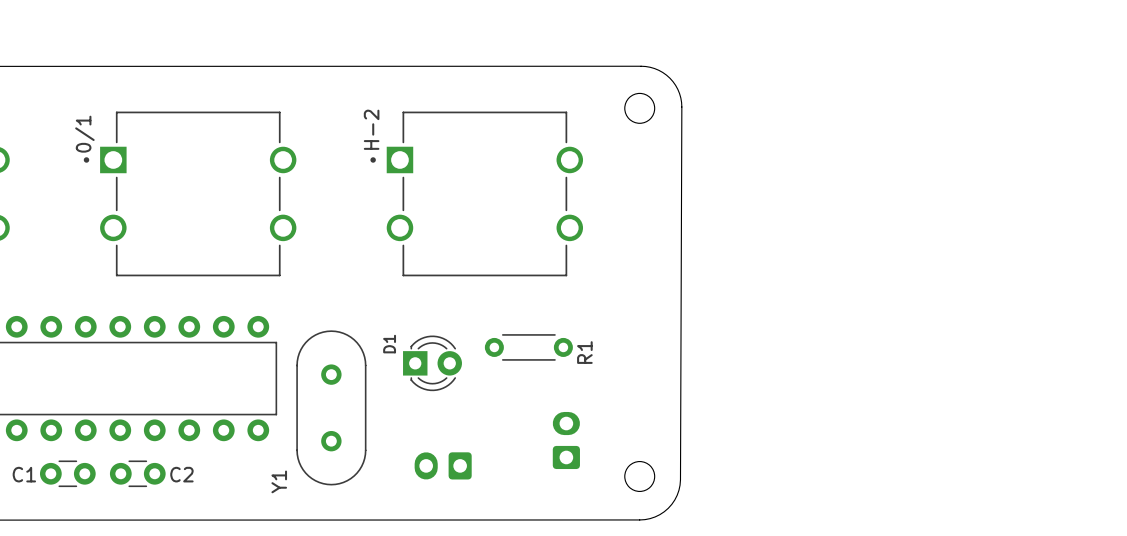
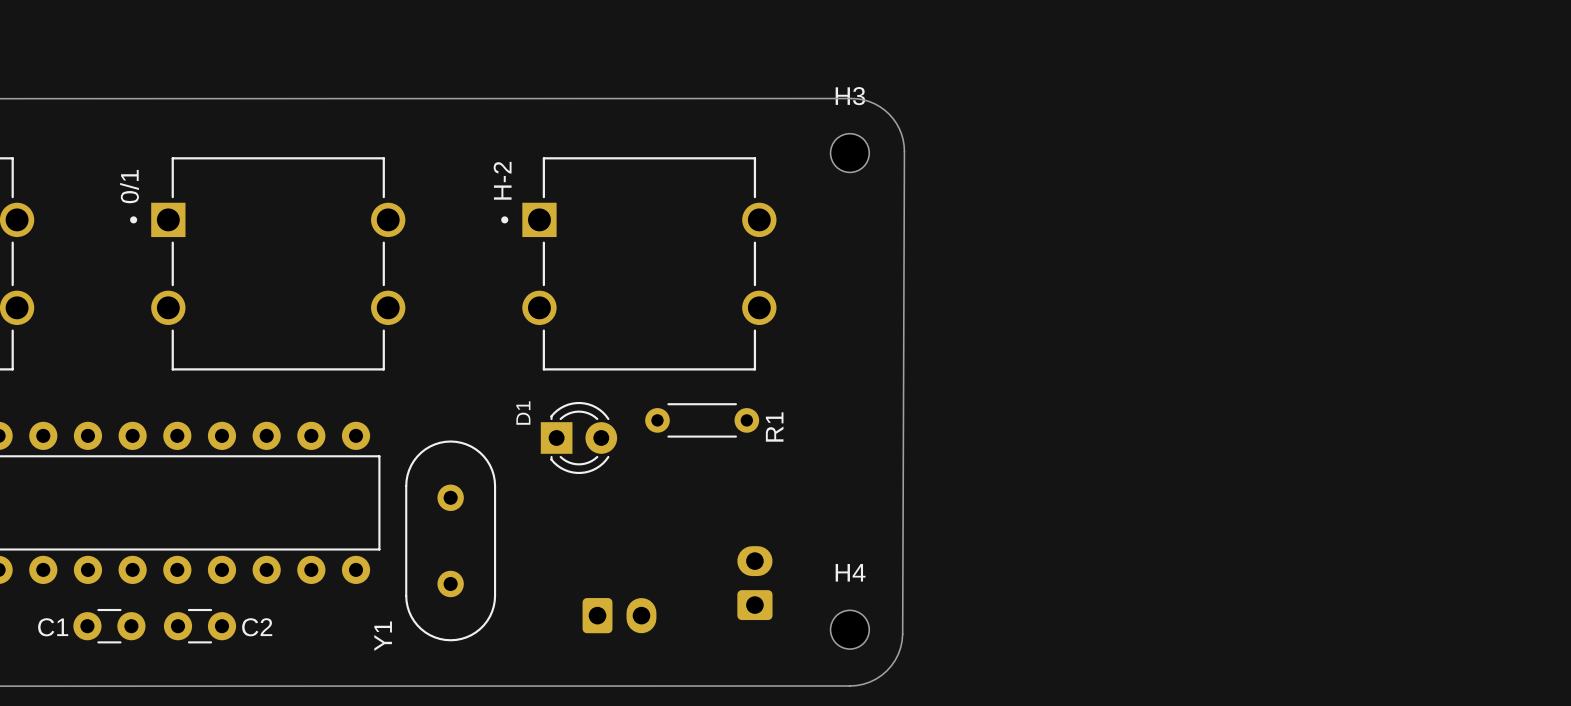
H3 name: none -> H3 (850, 96)
R1 position: (528, 347) -> (702, 420)
D1 position: (432, 363) -> (578, 437)
H4 name: none -> H4 (850, 572)
part rotation: 0° (443, 465) -> 180° (619, 615)

